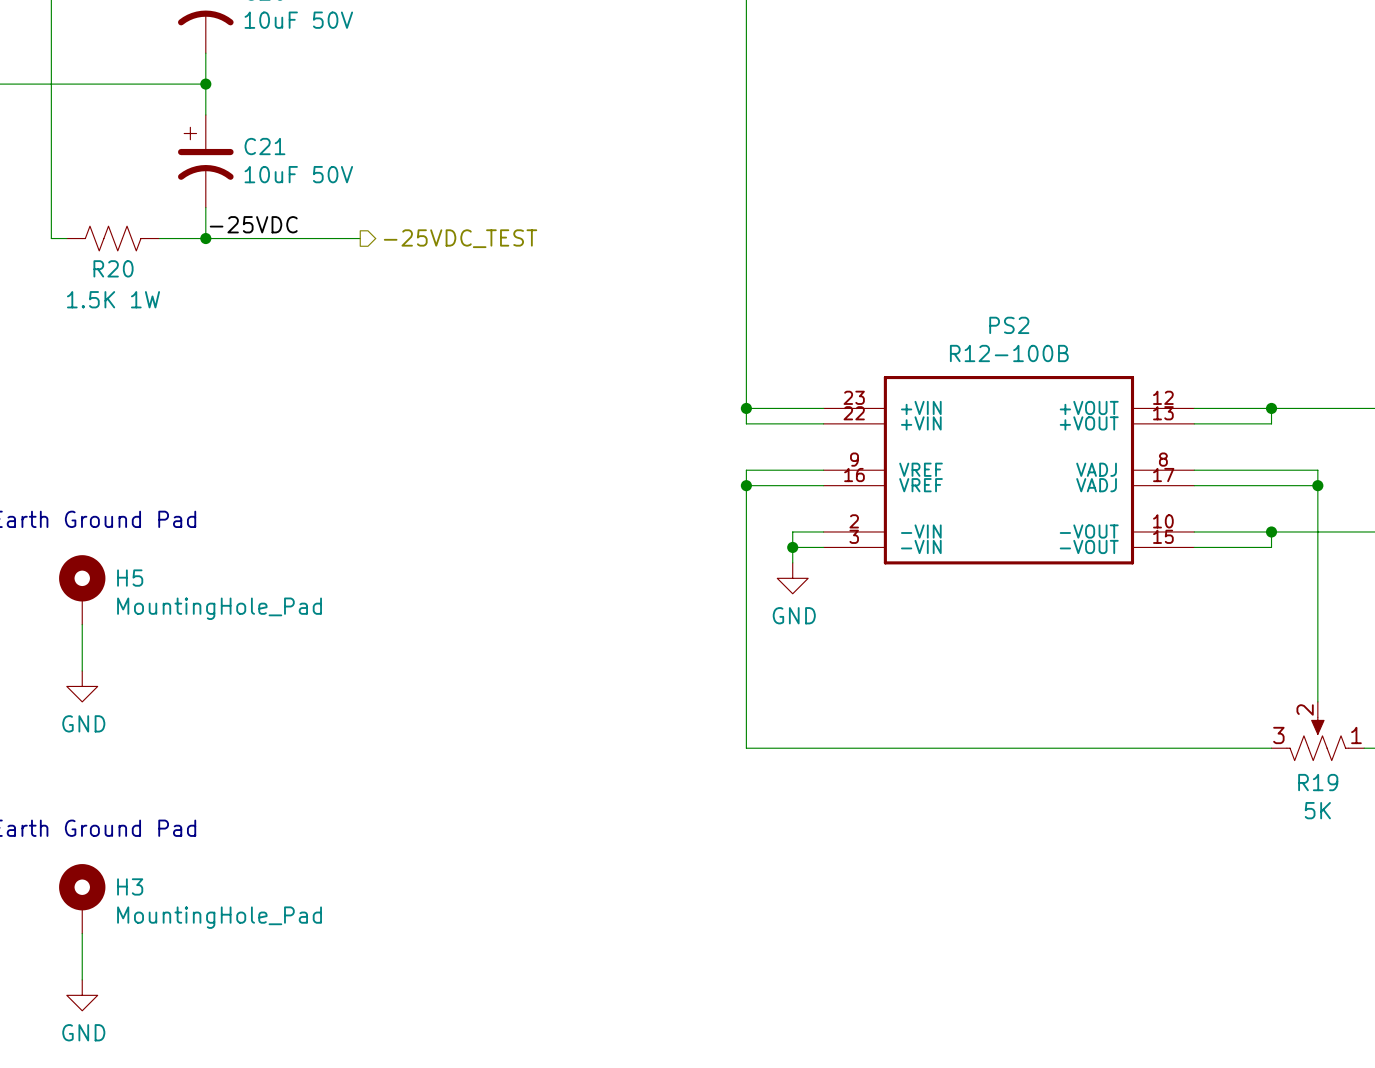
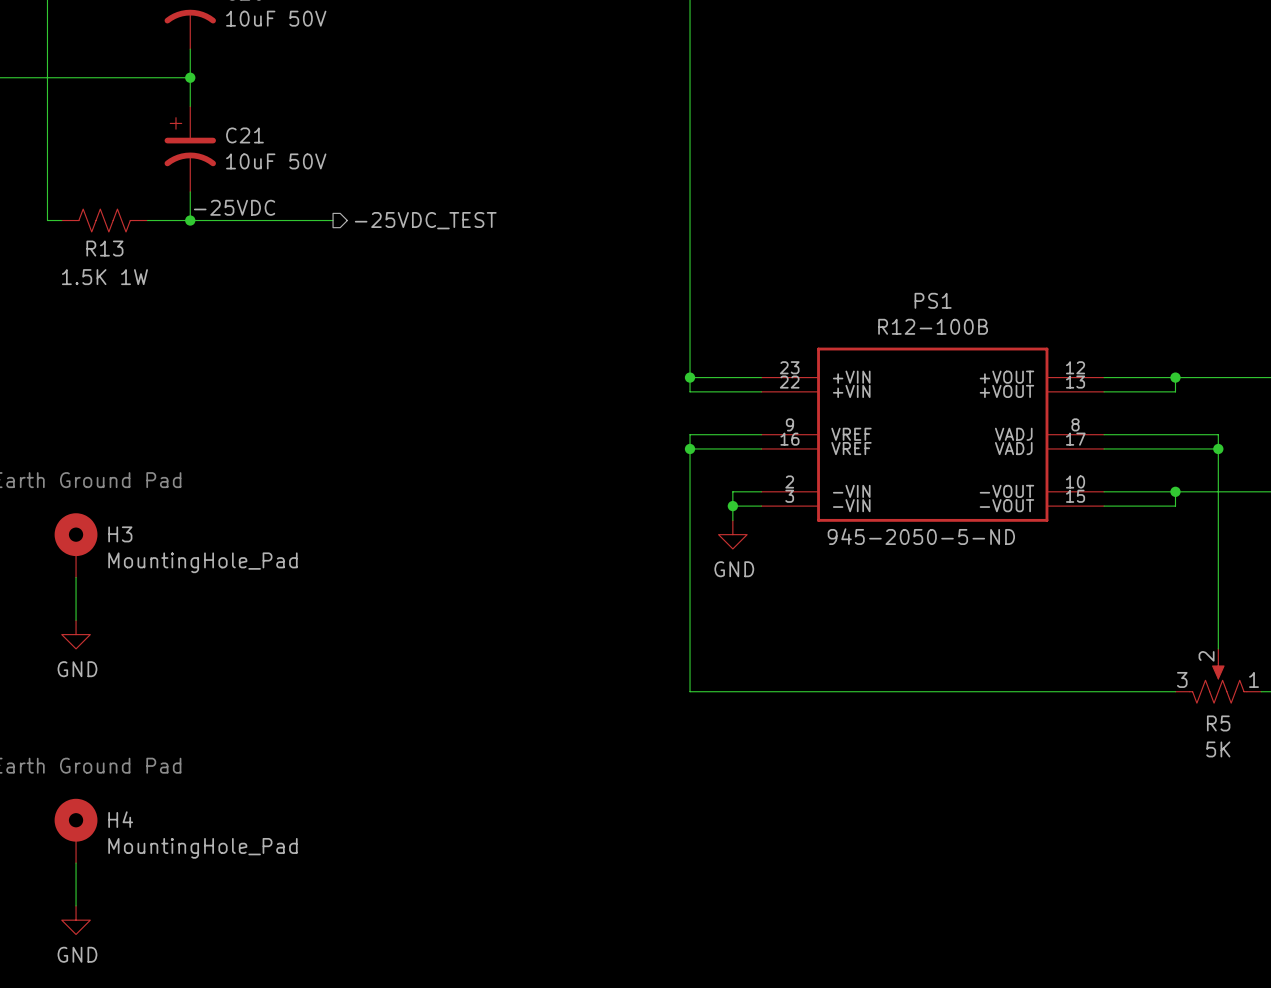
R20 name: R20 (113, 268) -> R13 (104, 248)
PS2 name: PS2 (1009, 325) -> PS1 (933, 300)
H5 name: H5 (130, 578) -> H3 (120, 534)
PS2 text: none -> 945-2050-5-ND (921, 536)
R19 name: R19 (1318, 782) -> R5 (1218, 723)
H3 name: H3 (130, 886) -> H4 (120, 819)

